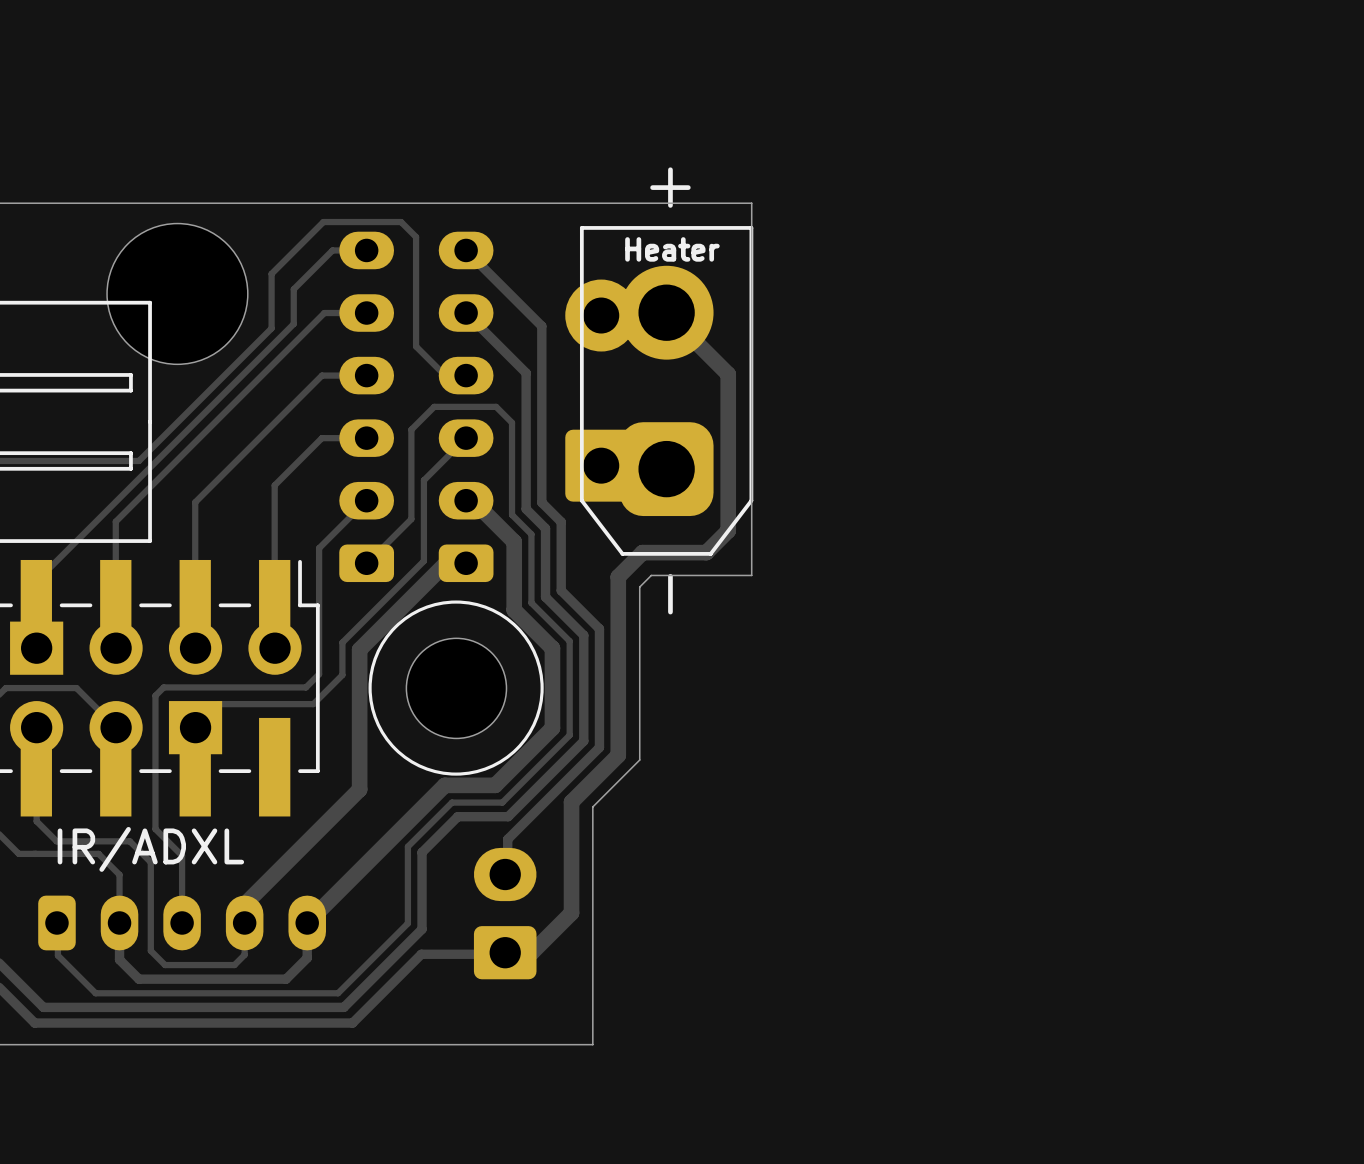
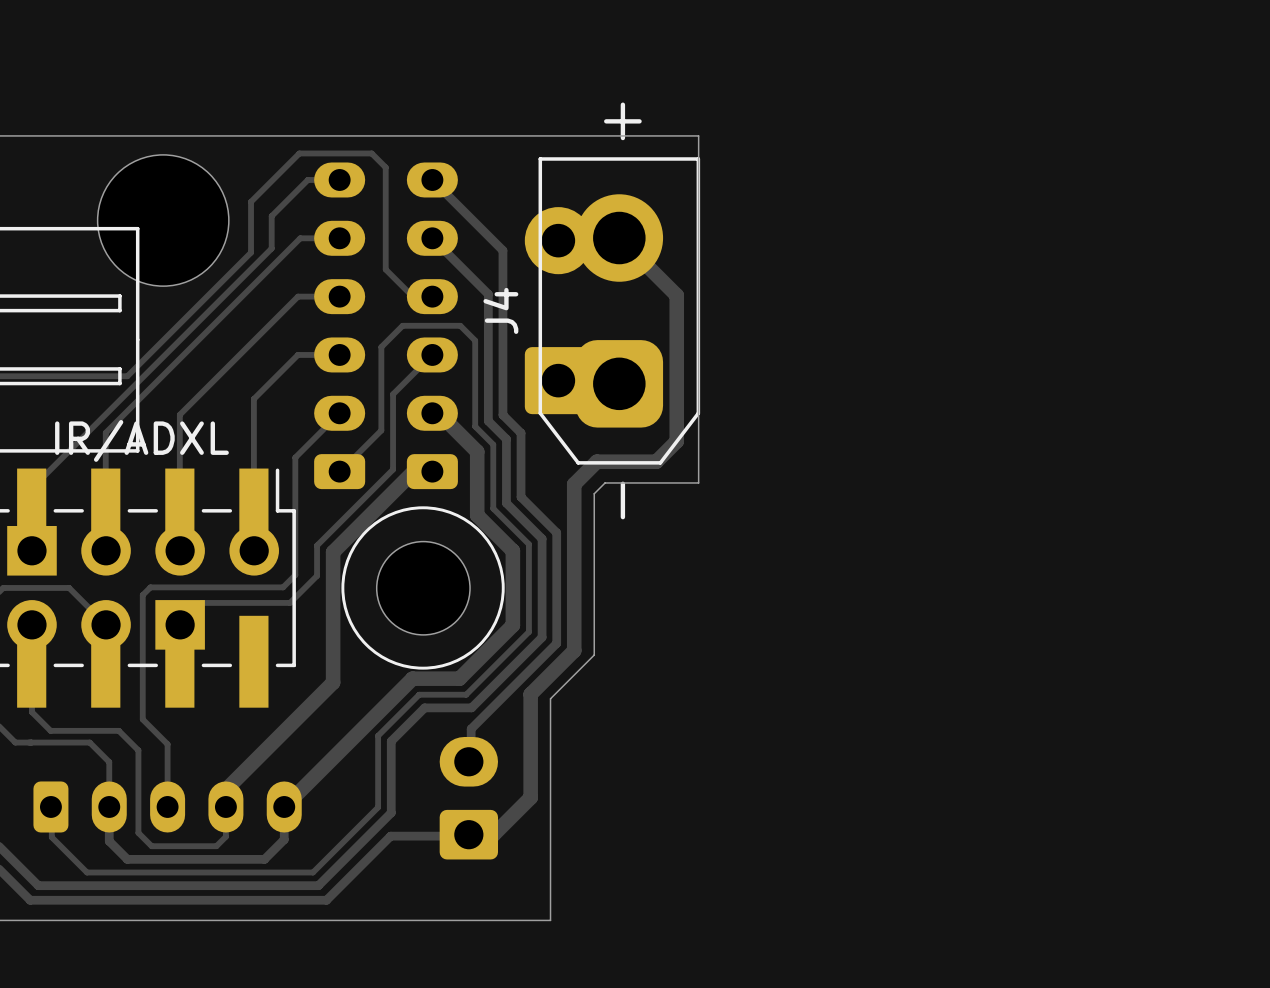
J4 value: Heater (672, 249) -> none
J4 name: none -> J4 (500, 310)
part value position: IR/ADXL (150, 849) -> IR/ADXL (141, 440)

